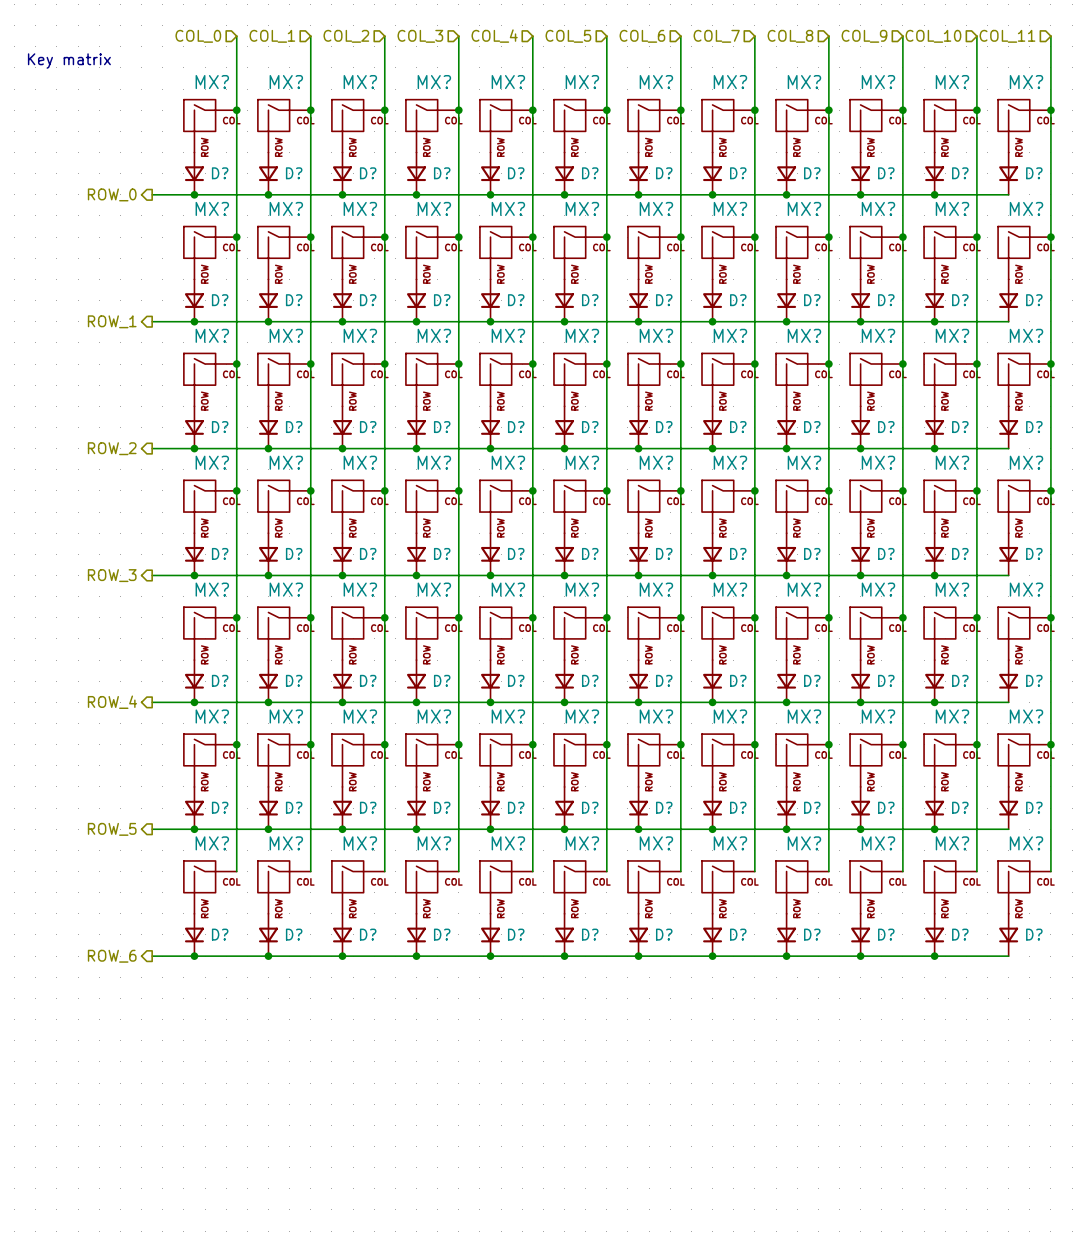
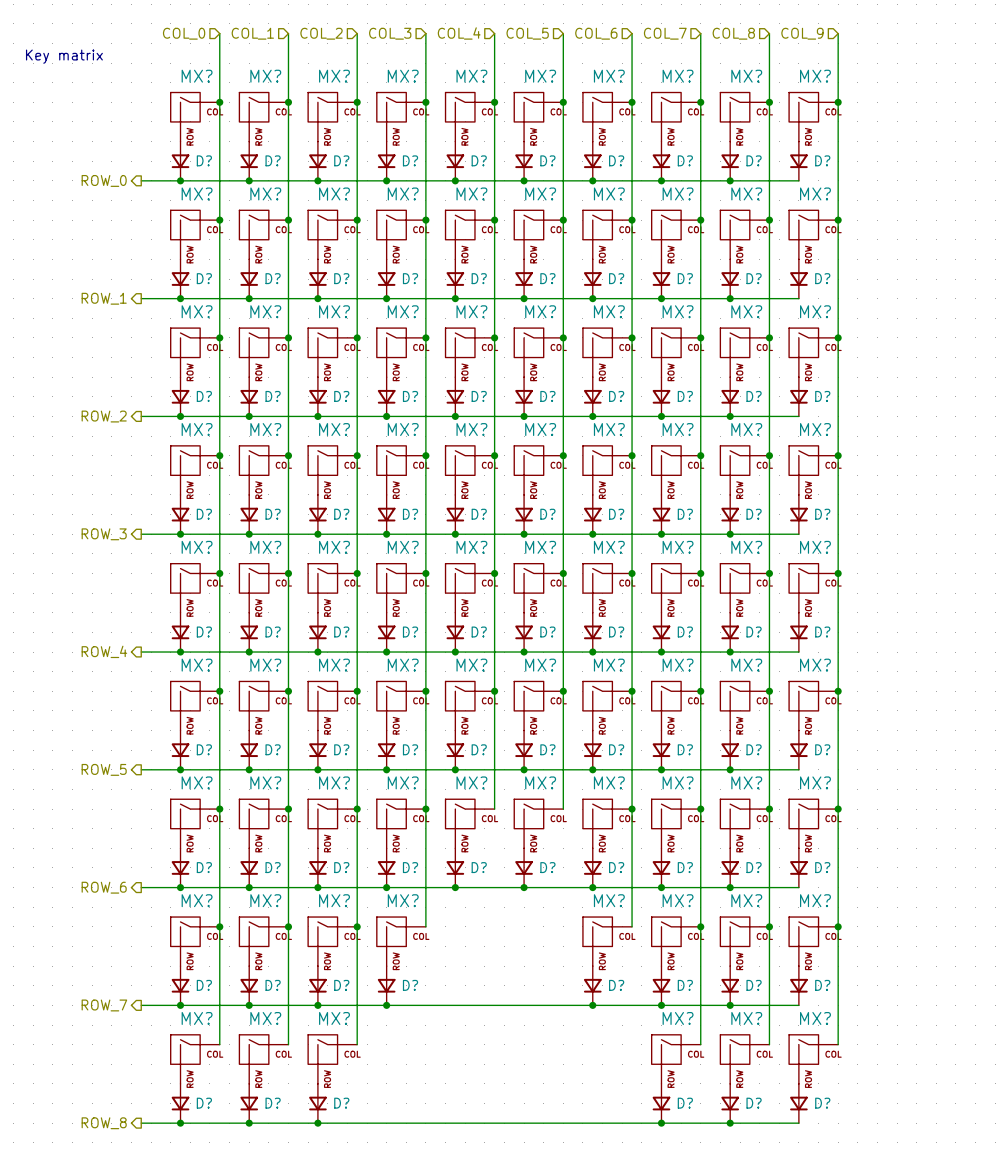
hierarchical label: COL_10 (933, 36) -> none
wire: (976, 36) (976, 871) -> none
hierarchical label: COL_11 (1007, 36) -> none
wire: (1050, 36) (1050, 871) -> none
junction: (976, 110) -> none
junction: (1050, 110) -> none
MX?: (950, 126) -> none
MX?: (1024, 126) -> none
D?: (934, 173) -> none
D?: (1008, 173) -> none
wire: (860, 194) (1008, 194) -> none
junction: (860, 194) -> none
junction: (934, 194) -> none
junction: (976, 237) -> none
junction: (1050, 237) -> none
MX?: (950, 252) -> none
MX?: (1024, 252) -> none
D?: (934, 300) -> none
D?: (1008, 300) -> none
wire: (860, 321) (1008, 321) -> none
junction: (860, 321) -> none
junction: (934, 321) -> none
junction: (976, 364) -> none
junction: (1050, 364) -> none
MX?: (950, 379) -> none
MX?: (1024, 379) -> none
D?: (934, 427) -> none
D?: (1008, 427) -> none
wire: (860, 448) (1008, 448) -> none
junction: (860, 448) -> none
junction: (934, 448) -> none
junction: (976, 490) -> none
junction: (1050, 490) -> none
MX?: (950, 506) -> none
MX?: (1024, 506) -> none
D?: (934, 554) -> none
D?: (1008, 554) -> none
wire: (860, 575) (1008, 575) -> none
junction: (860, 575) -> none
junction: (934, 575) -> none
junction: (976, 617) -> none
junction: (1050, 617) -> none
MX?: (950, 633) -> none
MX?: (1024, 633) -> none
D?: (934, 681) -> none
D?: (1008, 681) -> none
wire: (860, 702) (1008, 702) -> none
junction: (860, 702) -> none
junction: (934, 702) -> none
junction: (976, 744) -> none
junction: (1050, 744) -> none
MX?: (950, 760) -> none
MX?: (1024, 760) -> none
D?: (934, 808) -> none
D?: (1008, 808) -> none
wire: (860, 829) (1008, 829) -> none
junction: (860, 829) -> none
junction: (934, 829) -> none
wire: none -> (219, 809) (219, 1044)
junction: none -> (219, 809)
wire: none -> (288, 809) (288, 1044)
junction: none -> (288, 809)
wire: none -> (357, 809) (357, 1044)
junction: none -> (357, 809)
wire: none -> (425, 809) (425, 926)
junction: none -> (425, 809)
wire: none -> (632, 809) (632, 926)
junction: none -> (632, 809)
wire: none -> (700, 809) (700, 1044)
junction: none -> (700, 809)
wire: none -> (769, 809) (769, 1044)
junction: none -> (769, 809)
wire: none -> (838, 809) (838, 1044)
junction: none -> (838, 809)
MX?: (950, 887) -> none
MX?: (1024, 887) -> none
D?: (934, 934) -> none
D?: (1008, 934) -> none
wire: (860, 956) (1008, 956) -> none
junction: (860, 956) -> none
junction: (934, 956) -> none
junction: none -> (219, 926)
junction: none -> (288, 926)
junction: none -> (357, 926)
junction: none -> (700, 926)
junction: none -> (769, 926)
junction: none -> (838, 926)
MX?: none -> (195, 941)
MX?: none -> (263, 941)
MX?: none -> (332, 941)
MX?: none -> (401, 941)
MX?: none -> (607, 941)
MX?: none -> (676, 941)
MX?: none -> (744, 941)
MX?: none -> (813, 941)
D?: none -> (180, 985)
D?: none -> (249, 985)
D?: none -> (317, 985)
D?: none -> (386, 985)
D?: none -> (592, 985)
D?: none -> (661, 985)
D?: none -> (730, 985)
D?: none -> (798, 985)
hierarchical label: none -> ROW_7 (104, 1005)
wire: none -> (141, 1005) (798, 1005)
junction: none -> (180, 1005)
junction: none -> (249, 1005)
junction: none -> (317, 1005)
junction: none -> (386, 1005)
junction: none -> (592, 1005)
junction: none -> (661, 1005)
junction: none -> (730, 1005)
MX?: none -> (195, 1059)
MX?: none -> (263, 1059)
MX?: none -> (332, 1059)
MX?: none -> (676, 1059)
MX?: none -> (744, 1059)
MX?: none -> (813, 1059)
D?: none -> (180, 1103)
D?: none -> (249, 1103)
D?: none -> (317, 1103)
D?: none -> (661, 1103)
D?: none -> (730, 1103)
D?: none -> (798, 1103)
wire: none -> (141, 1123) (798, 1123)
junction: none -> (180, 1123)
junction: none -> (249, 1123)
junction: none -> (317, 1123)
junction: none -> (661, 1123)
junction: none -> (730, 1123)
hierarchical label: none -> ROW_8 (104, 1123)

